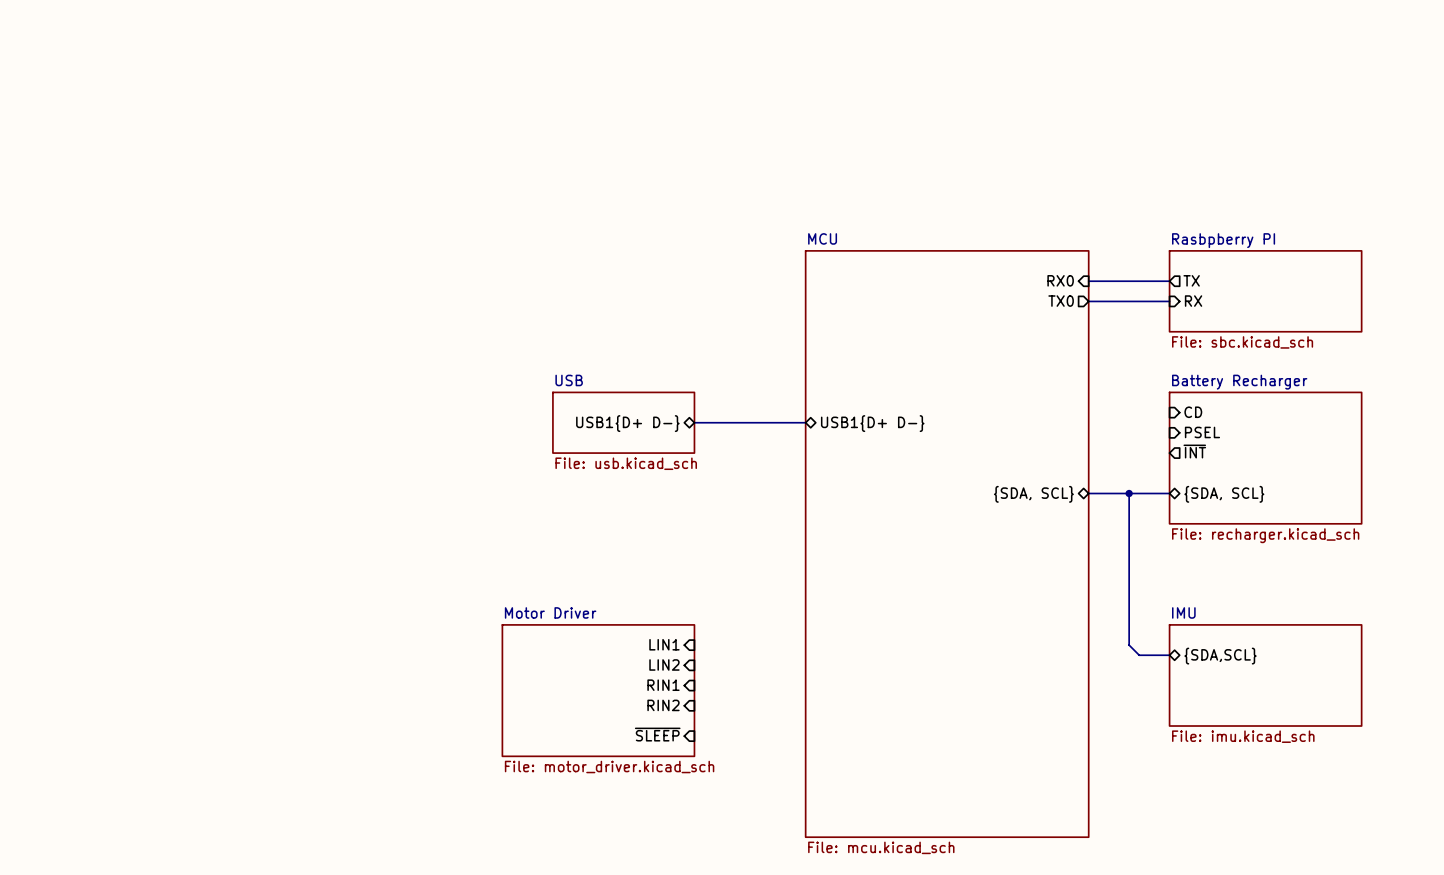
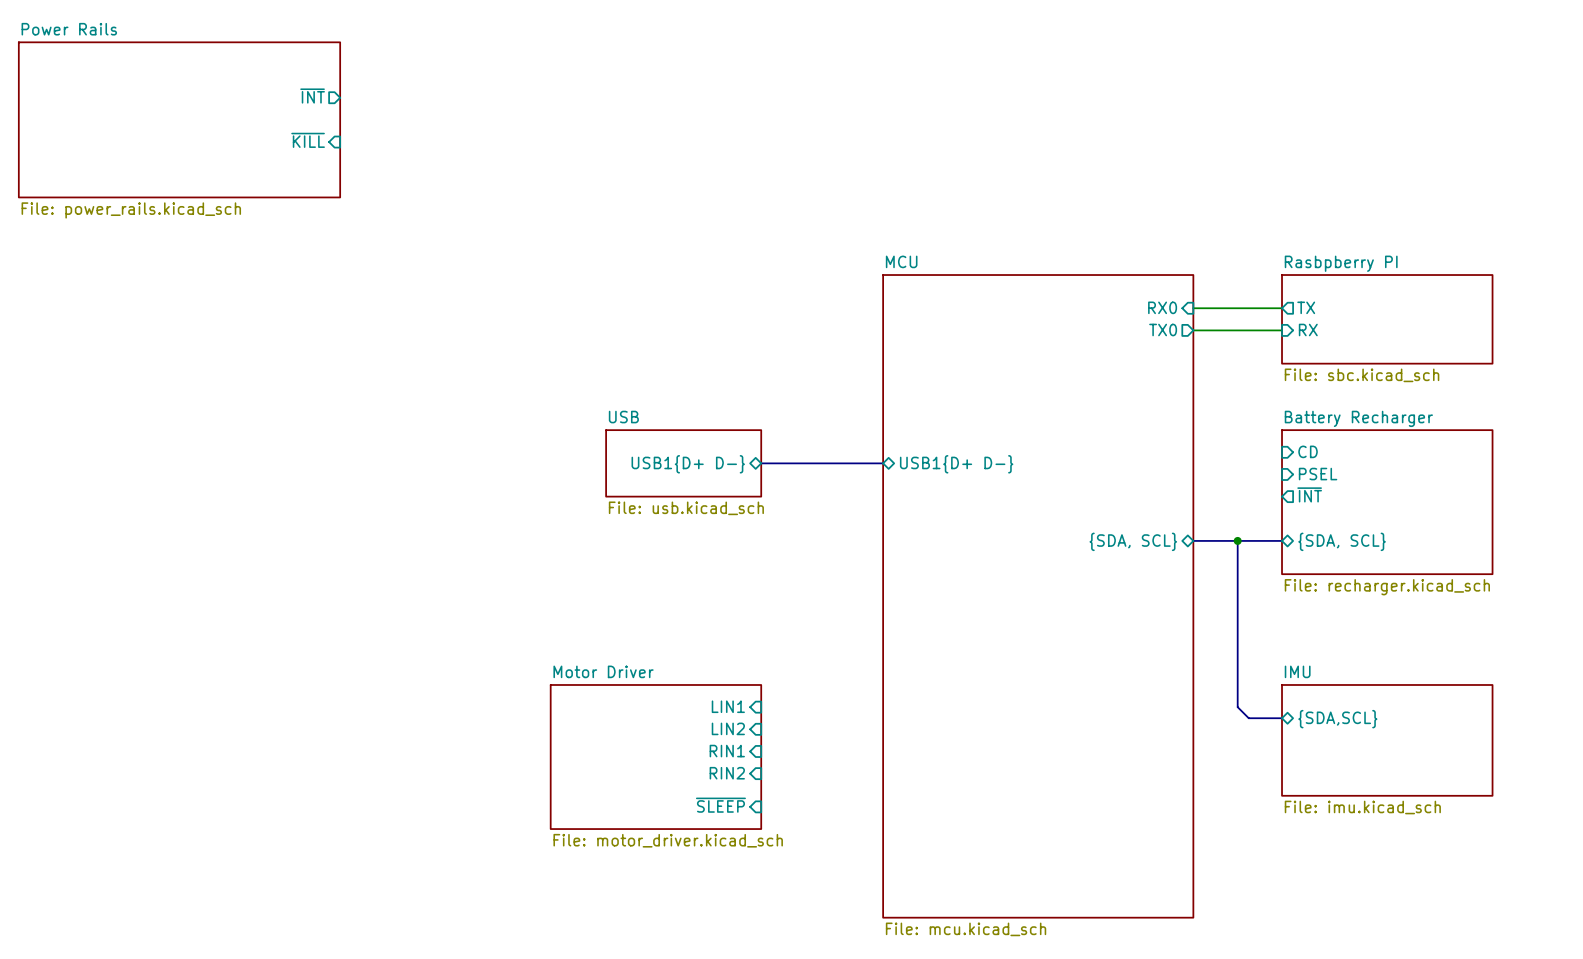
sheet pin: none -> ~{INT} (312, 96)
sheet Power Rails: none -> File: power_rails.kicad_sch (179, 119)
sheet pin: none -> ~{KILL} (308, 140)

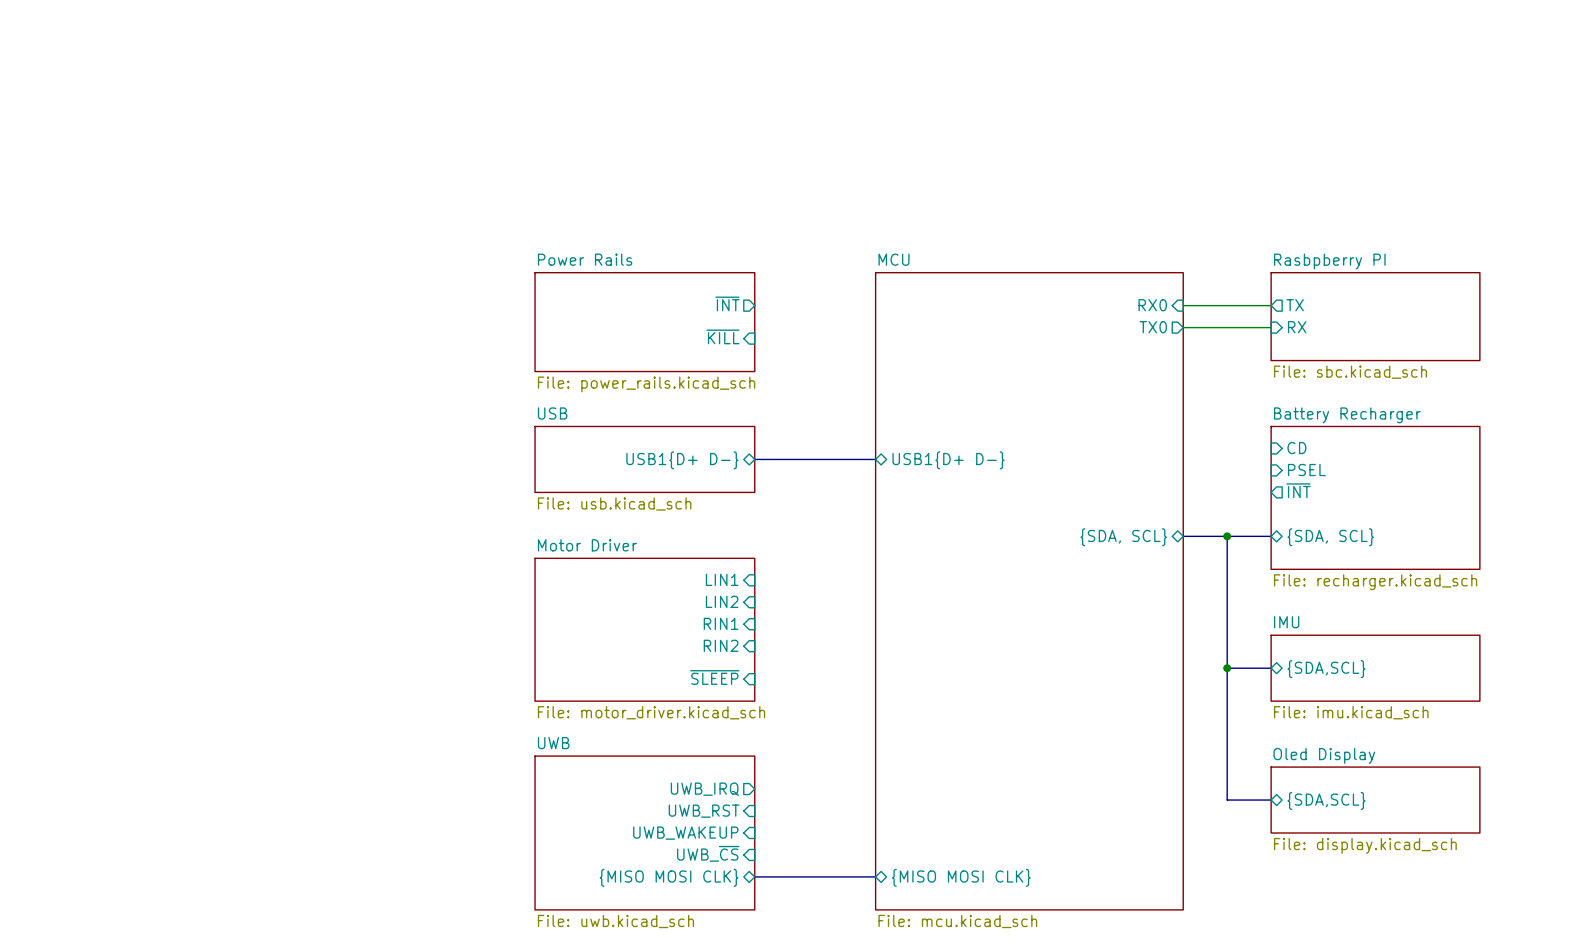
sheet pin: ~{INT} (312, 96) -> none
sheet Power Rails: File: power_rails.kicad_sch (179, 119) -> none
sheet pin: ~{KILL} (308, 140) -> none
sheet pin: none -> ~{INT} (727, 303)
sheet Power Rails: none -> File: power_rails.kicad_sch (644, 322)
sheet pin: none -> ~{KILL} (722, 336)
sheet USB: none -> File: usb.kicad_sch (644, 459)
sheet USB: File: usb.kicad_sch (683, 463) -> none
sheet Motor Driver: none -> File: motor_driver.kicad_sch (644, 629)
bus: none -> (1227, 668) (1271, 668)
junction: none -> (1227, 668)
sheet IMU: none -> File: imu.kicad_sch (1375, 668)
sheet pin: none -> {SDA,SCL} (1326, 669)
sheet pin position: LIN1 (728, 706) -> LIN1 (722, 579)
bus: (1237, 707) (1248, 718) (1282, 718) -> (1227, 701) (1227, 800) (1271, 800)
sheet pin: {SDA,SCL} (1337, 719) -> none
sheet pin position: LIN2 (728, 728) -> LIN2 (722, 601)
sheet IMU: File: imu.kicad_sch (1387, 740) -> none
sheet pin position: RIN1 (727, 751) -> RIN1 (721, 623)
sheet Motor Driver: File: motor_driver.kicad_sch (655, 757) -> none
sheet pin position: RIN2 (727, 773) -> RIN2 (721, 645)
sheet pin: none -> UWB_IRQ (704, 789)
sheet pin position: ~{SLEEP} (720, 805) -> ~{SLEEP} (714, 677)
sheet Oled Display: none -> File: display.kicad_sch (1375, 800)
sheet pin: none -> {SDA,SCL} (1326, 800)
sheet pin: none -> UWB_RST (704, 811)
sheet UWB: none -> File: uwb.kicad_sch (644, 832)
sheet pin: none -> UWB_WAKEUP (685, 833)
sheet pin: none -> UWB_~{CS} (708, 853)
bus: none -> (754, 876) (875, 876)
sheet pin: none -> {MISO MOSI CLK} (669, 877)
sheet pin: none -> {MISO MOSI CLK} (961, 877)

